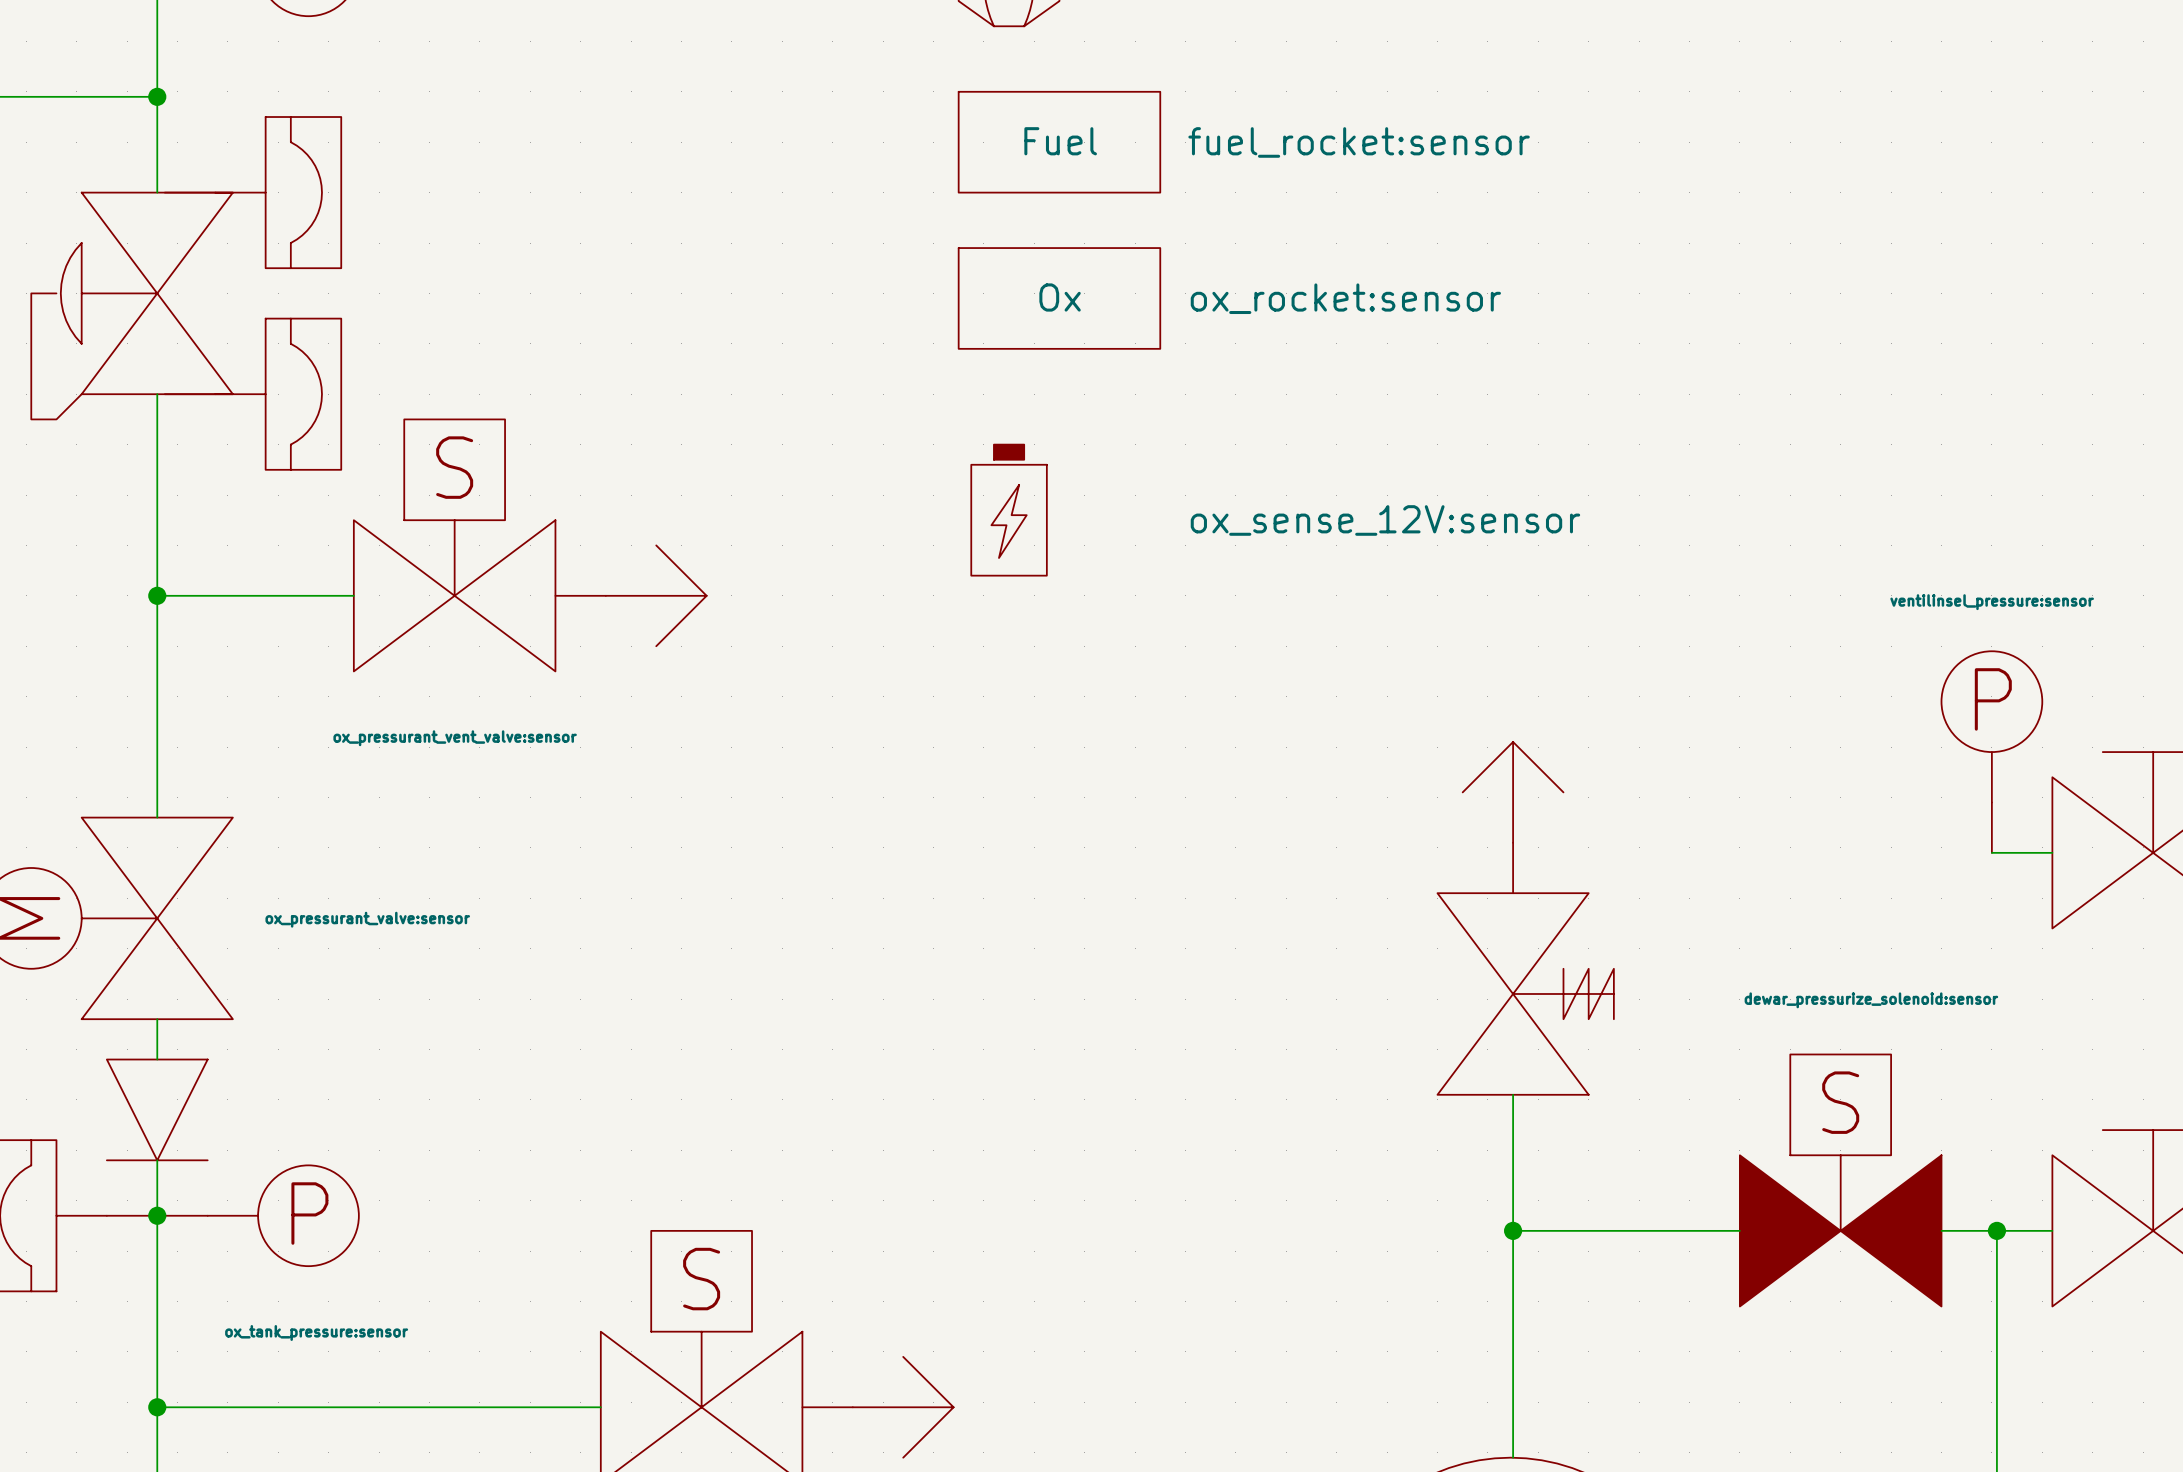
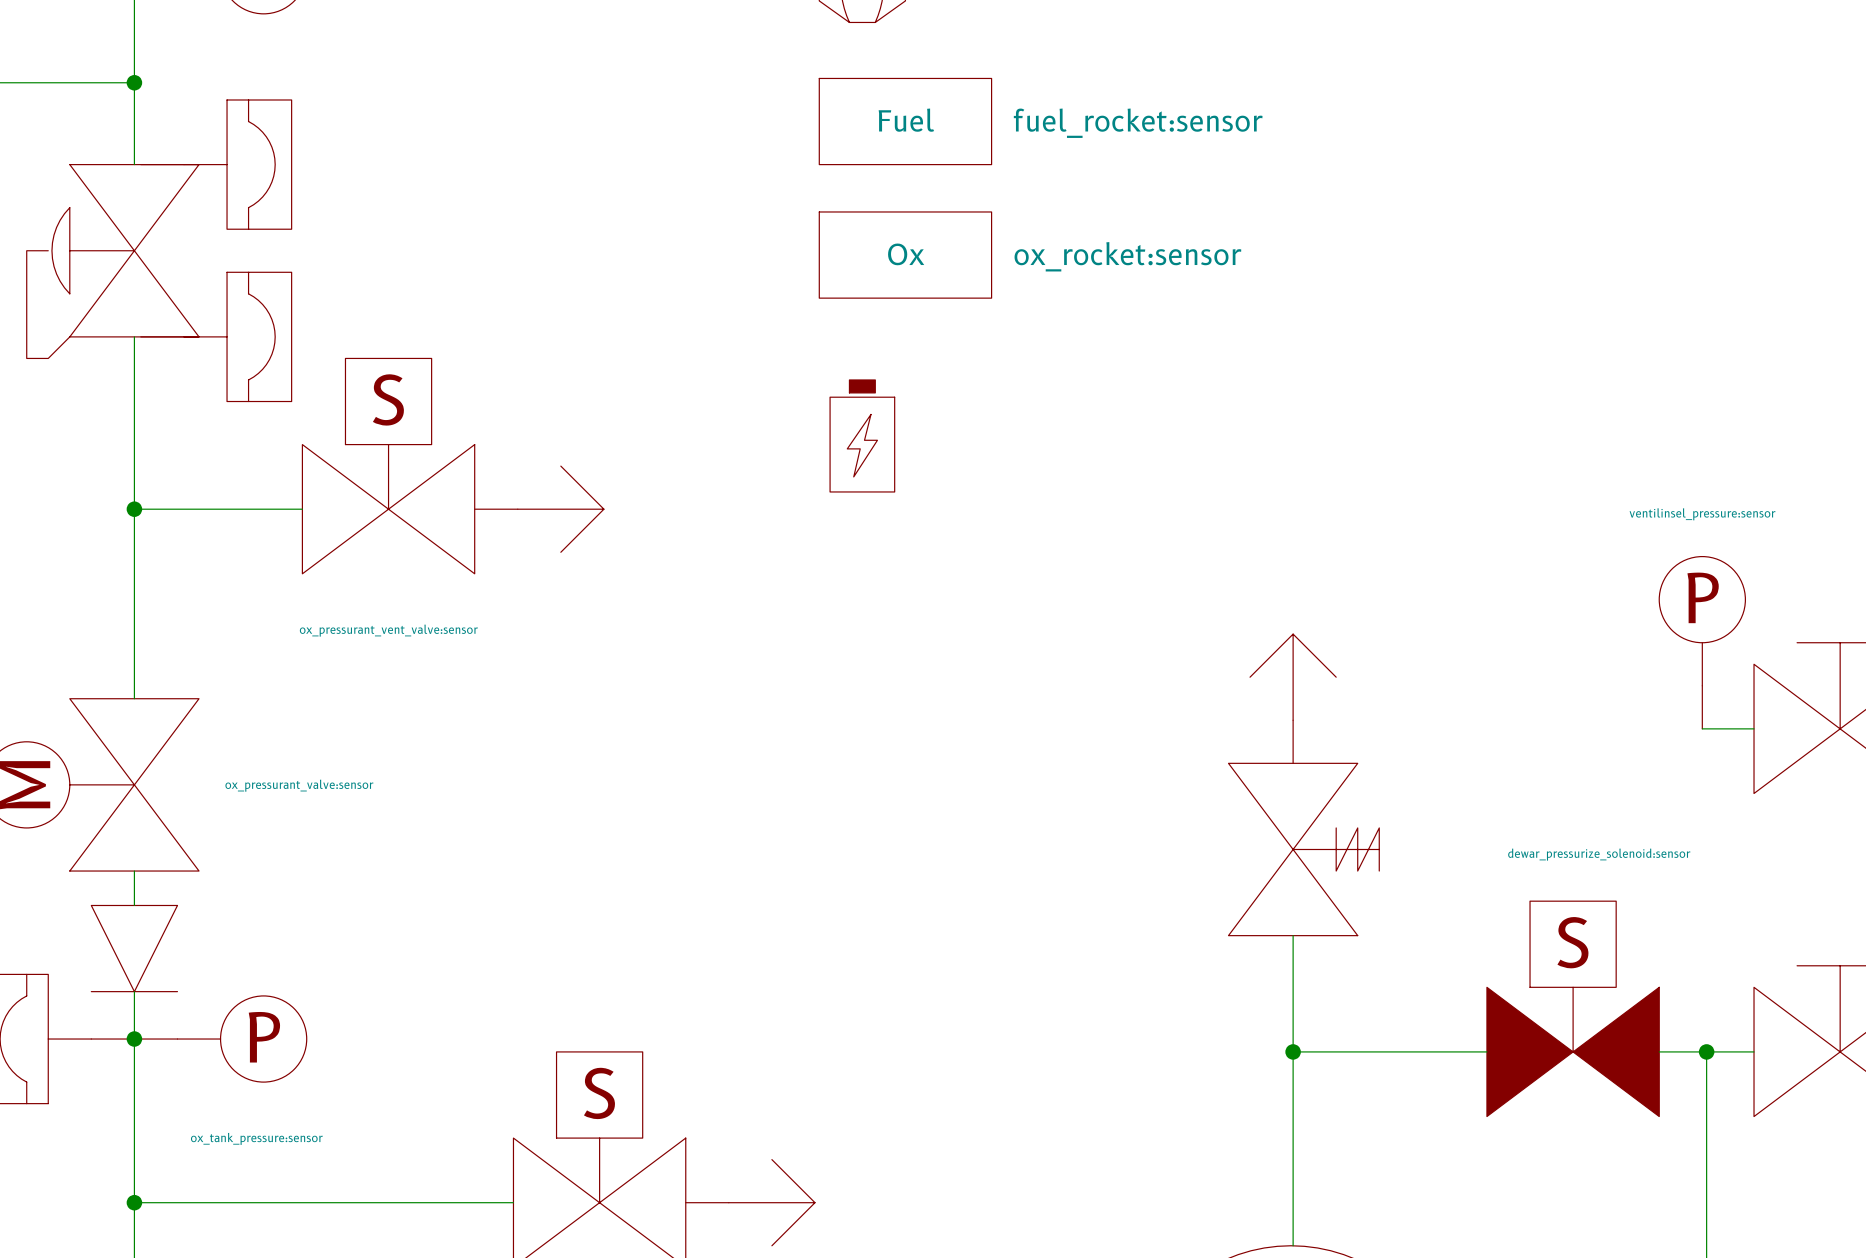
part value: ox_sense_12V:sensor (1385, 520) -> none

